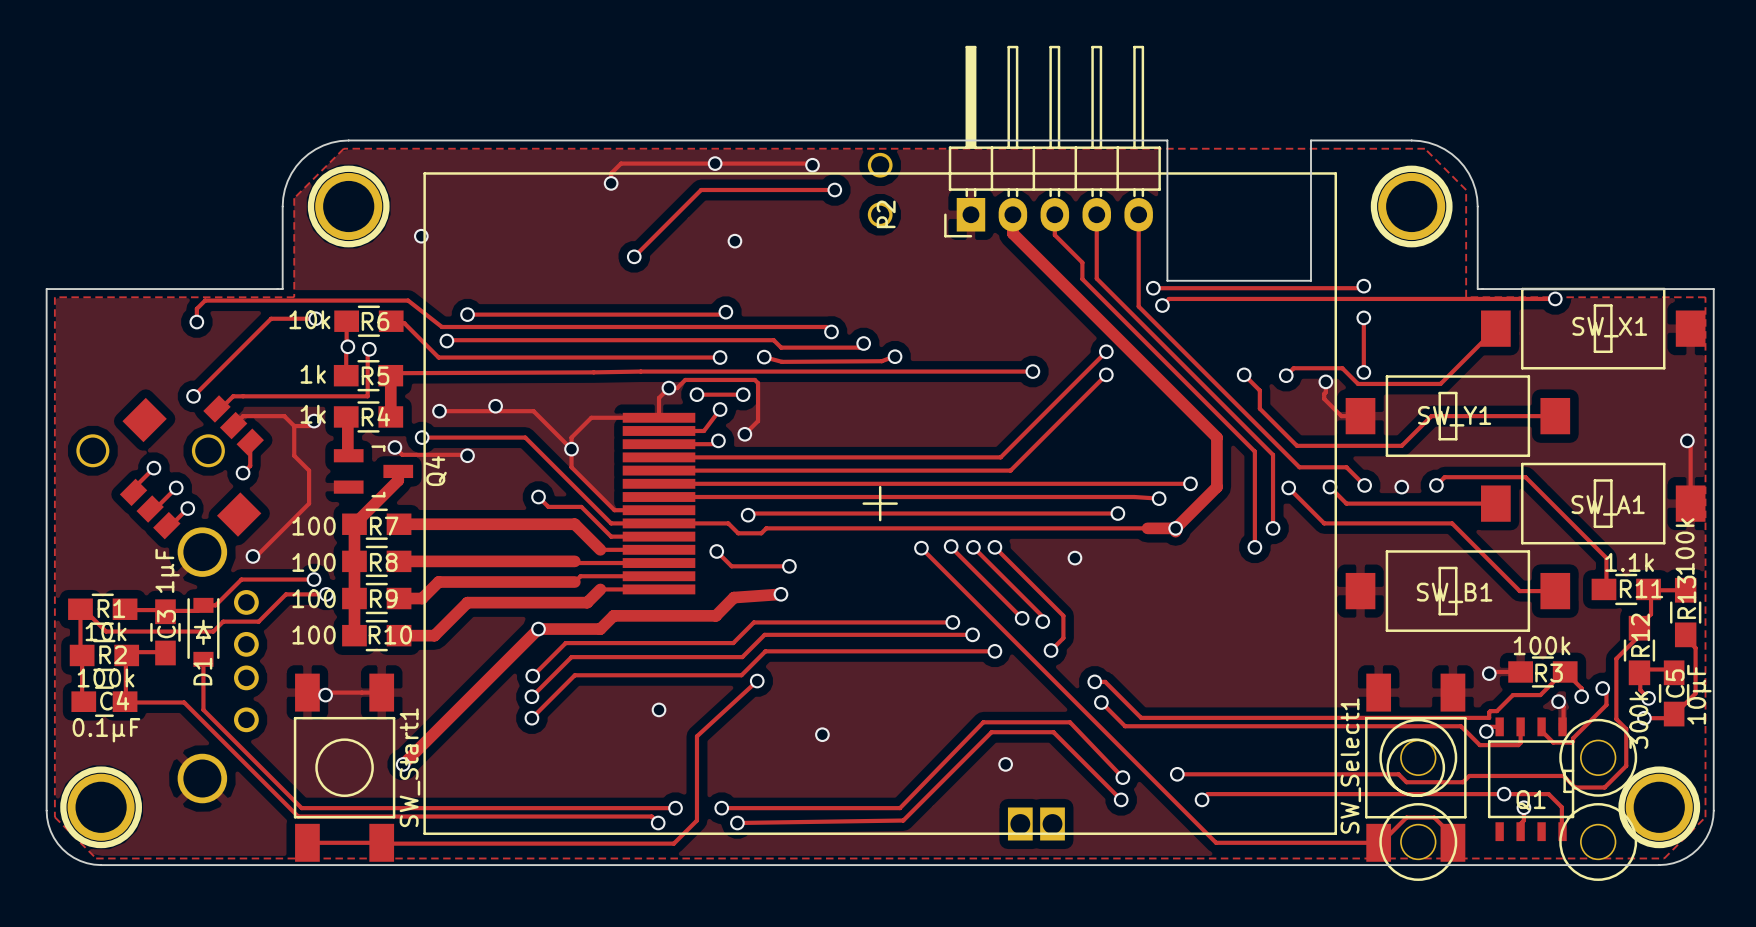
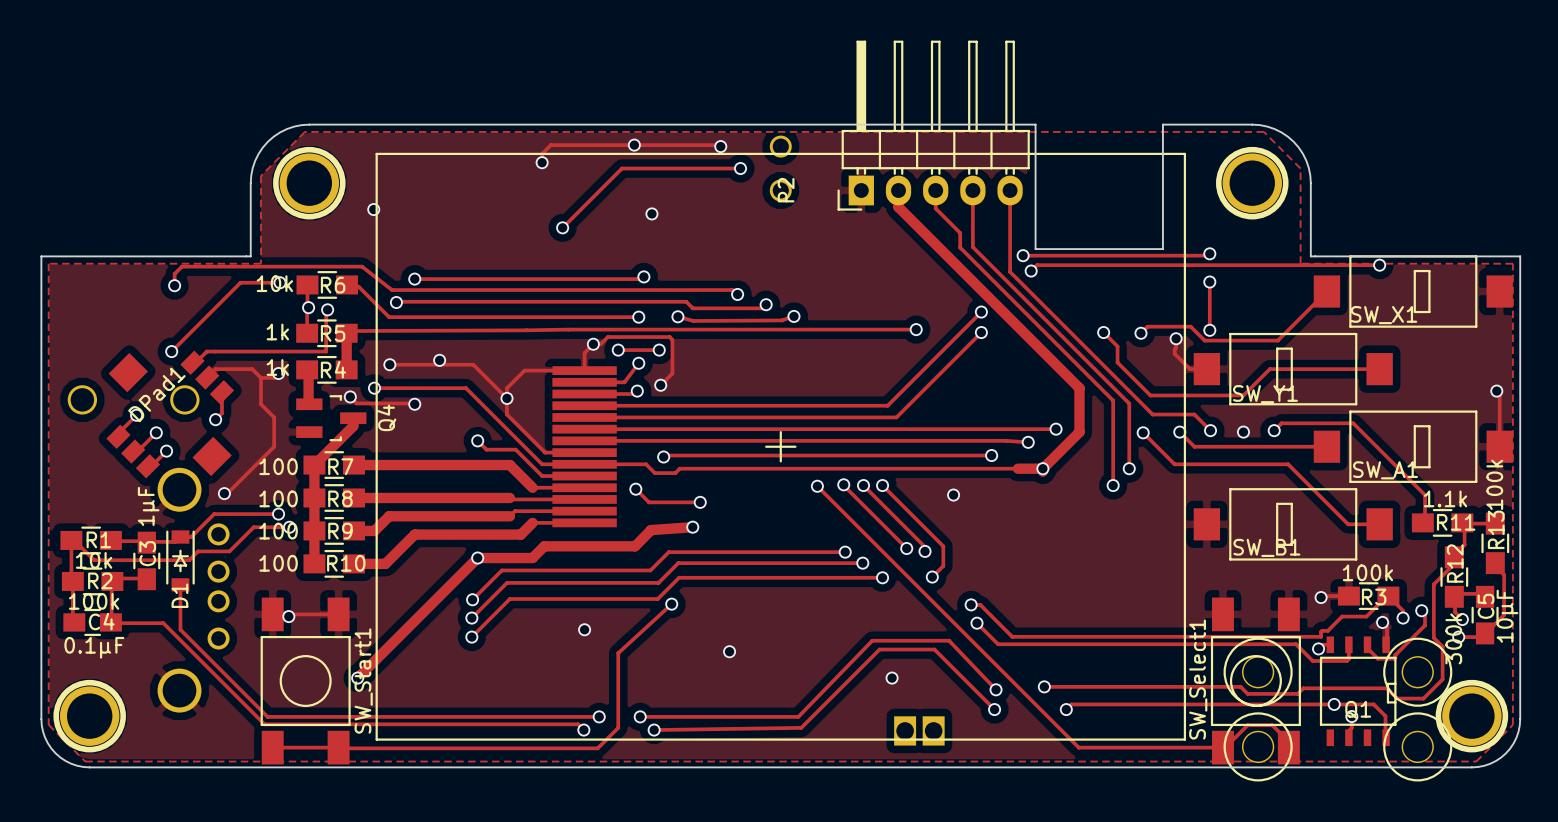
SW_X1 name position: SW_X1 (1609, 327) -> SW_X1 (1384, 315)
SW_Y1 name position: SW_Y1 (1454, 416) -> SW_Y1 (1265, 394)
DPad1 name: none -> DPad1 (156, 394)
SW_A1 name position: SW_A1 (1608, 505) -> SW_A1 (1385, 470)
SW_B1 name position: SW_B1 (1454, 592) -> SW_B1 (1266, 547)

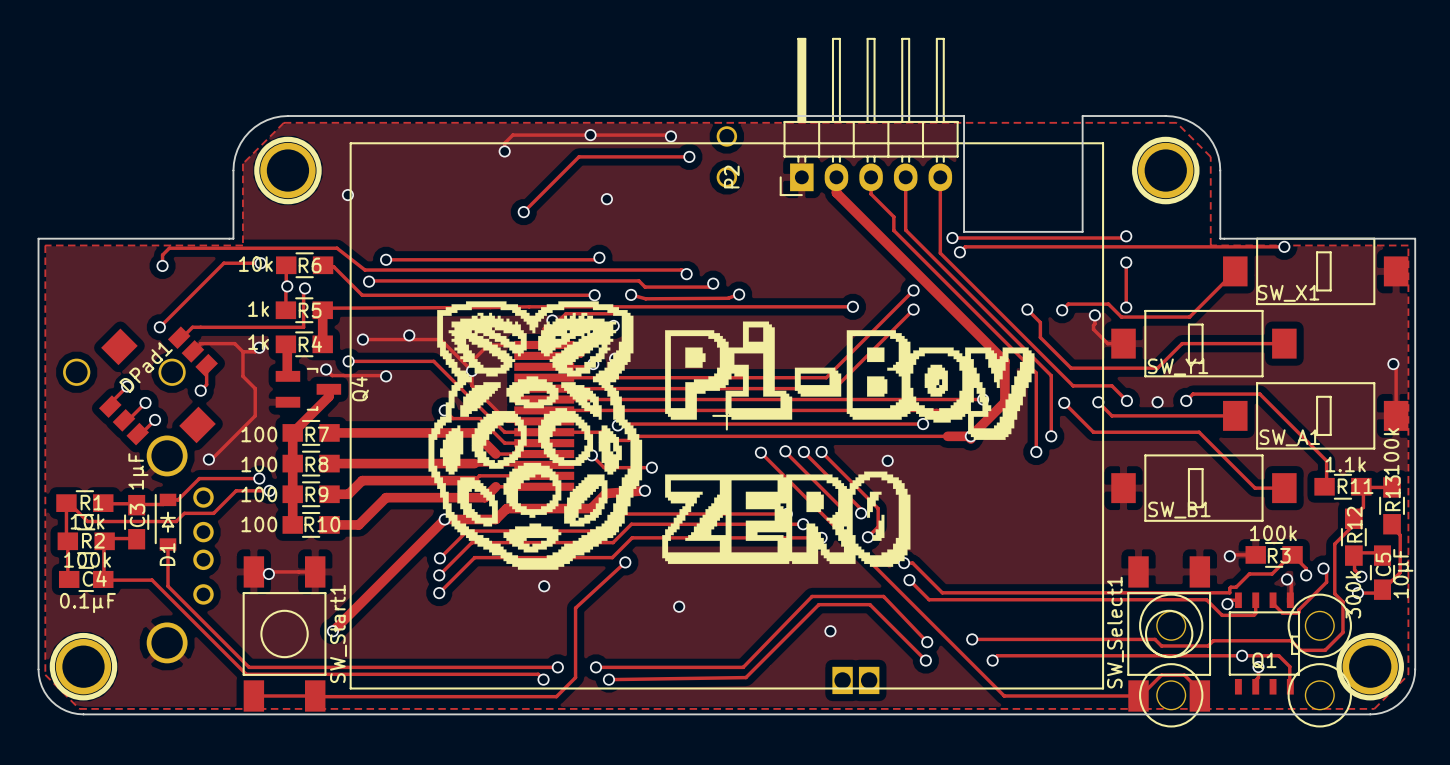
drawing: none -> [428, 301, 1035, 570]

